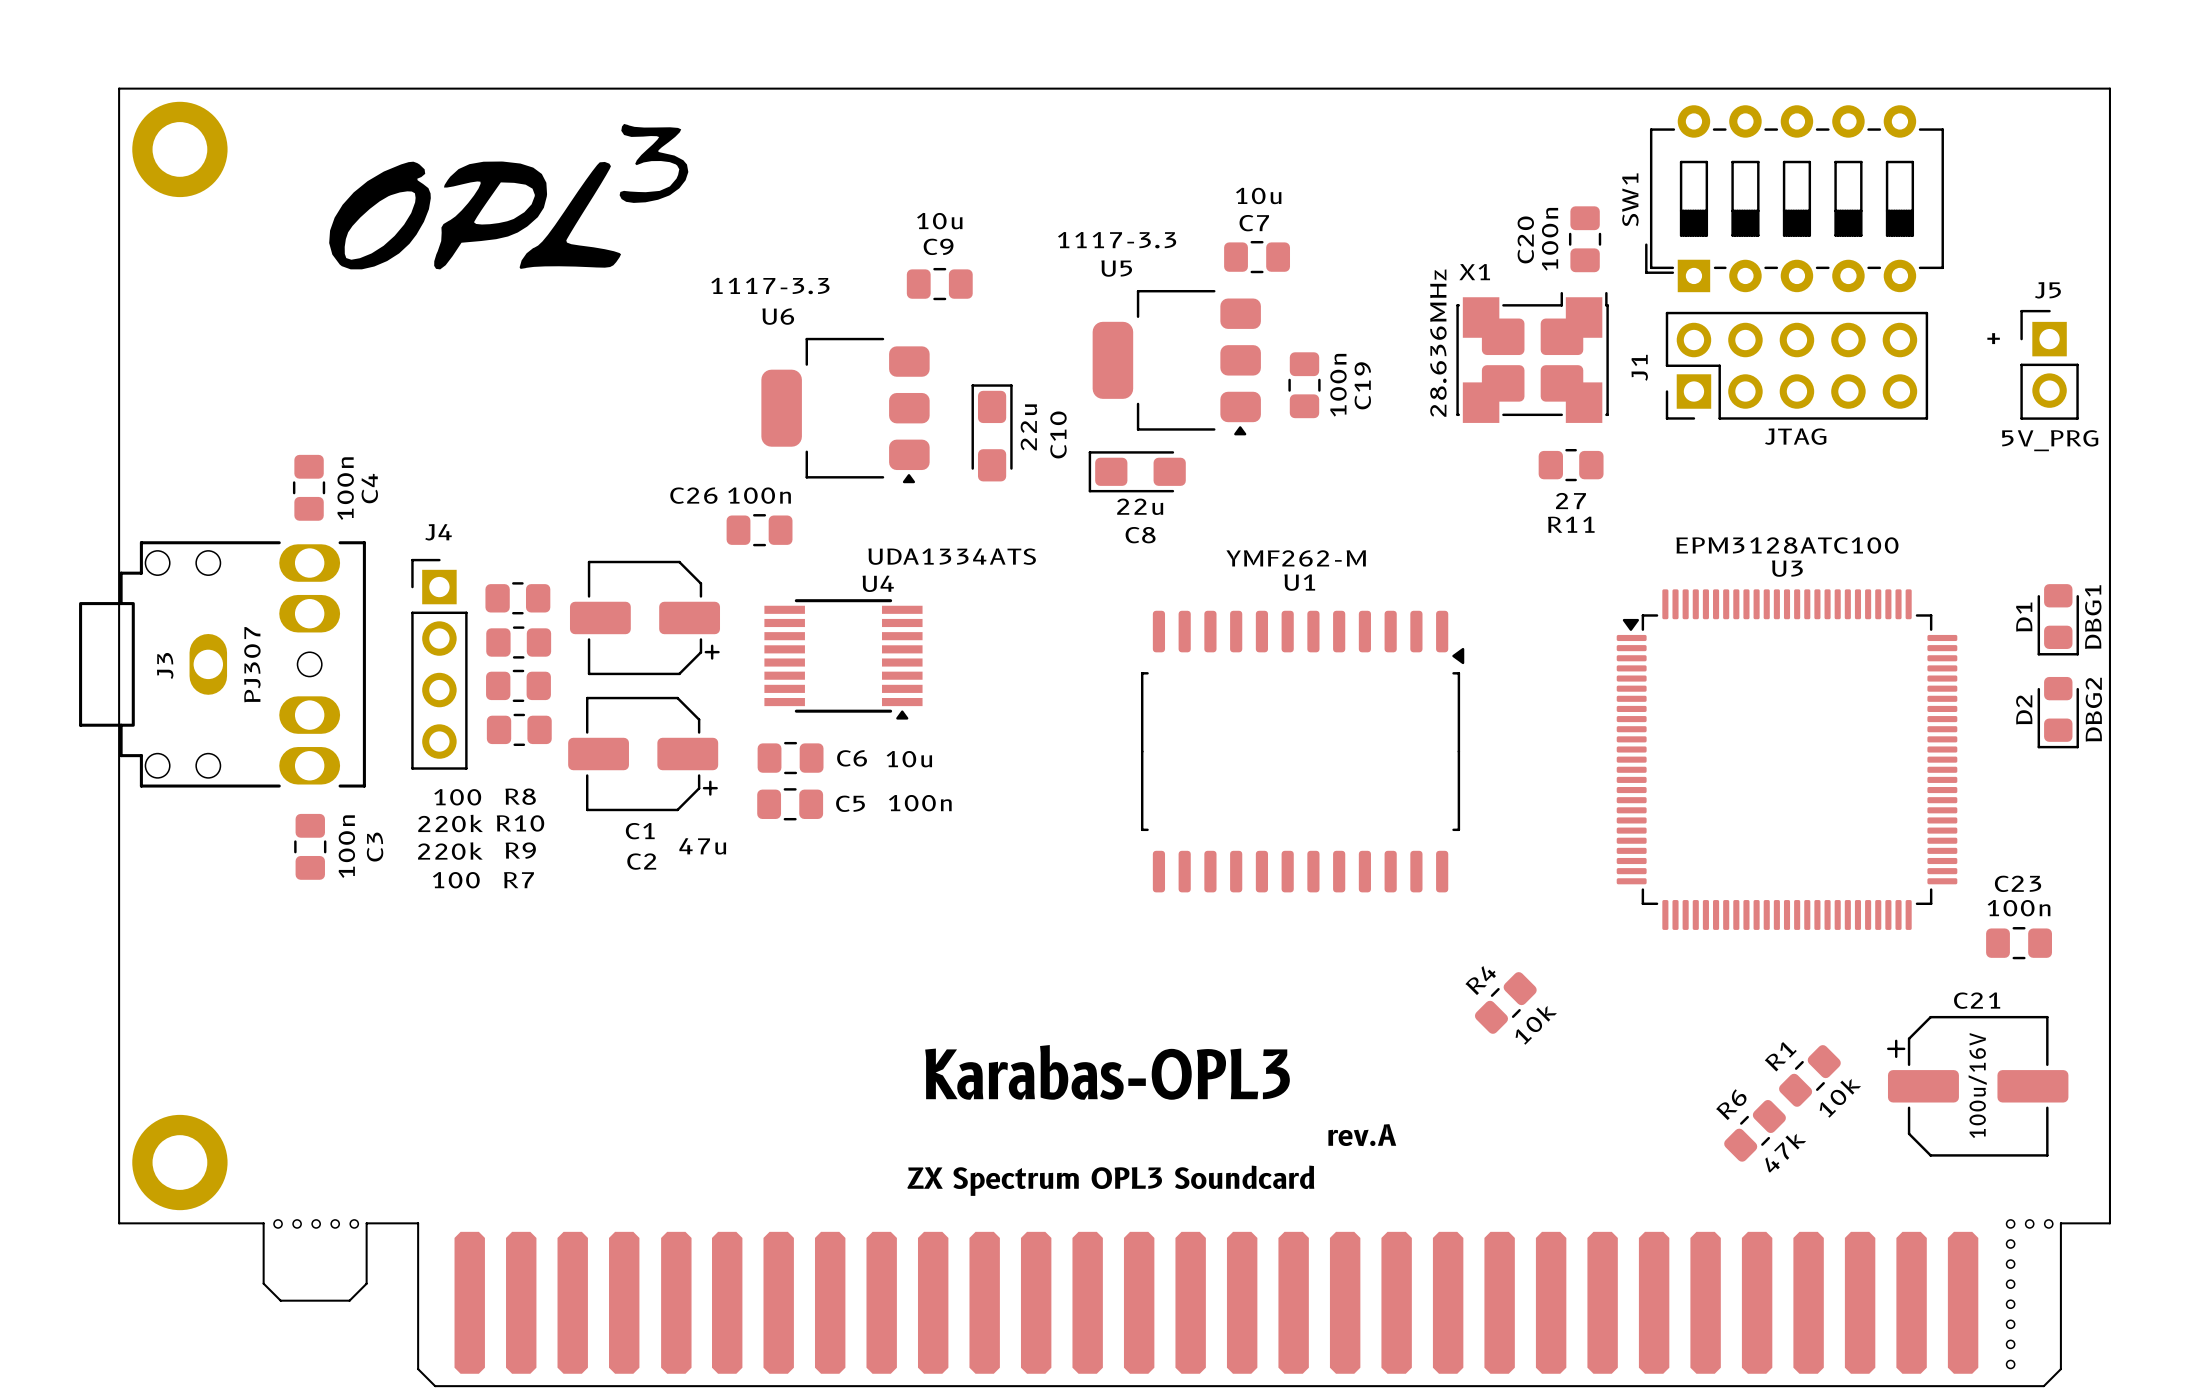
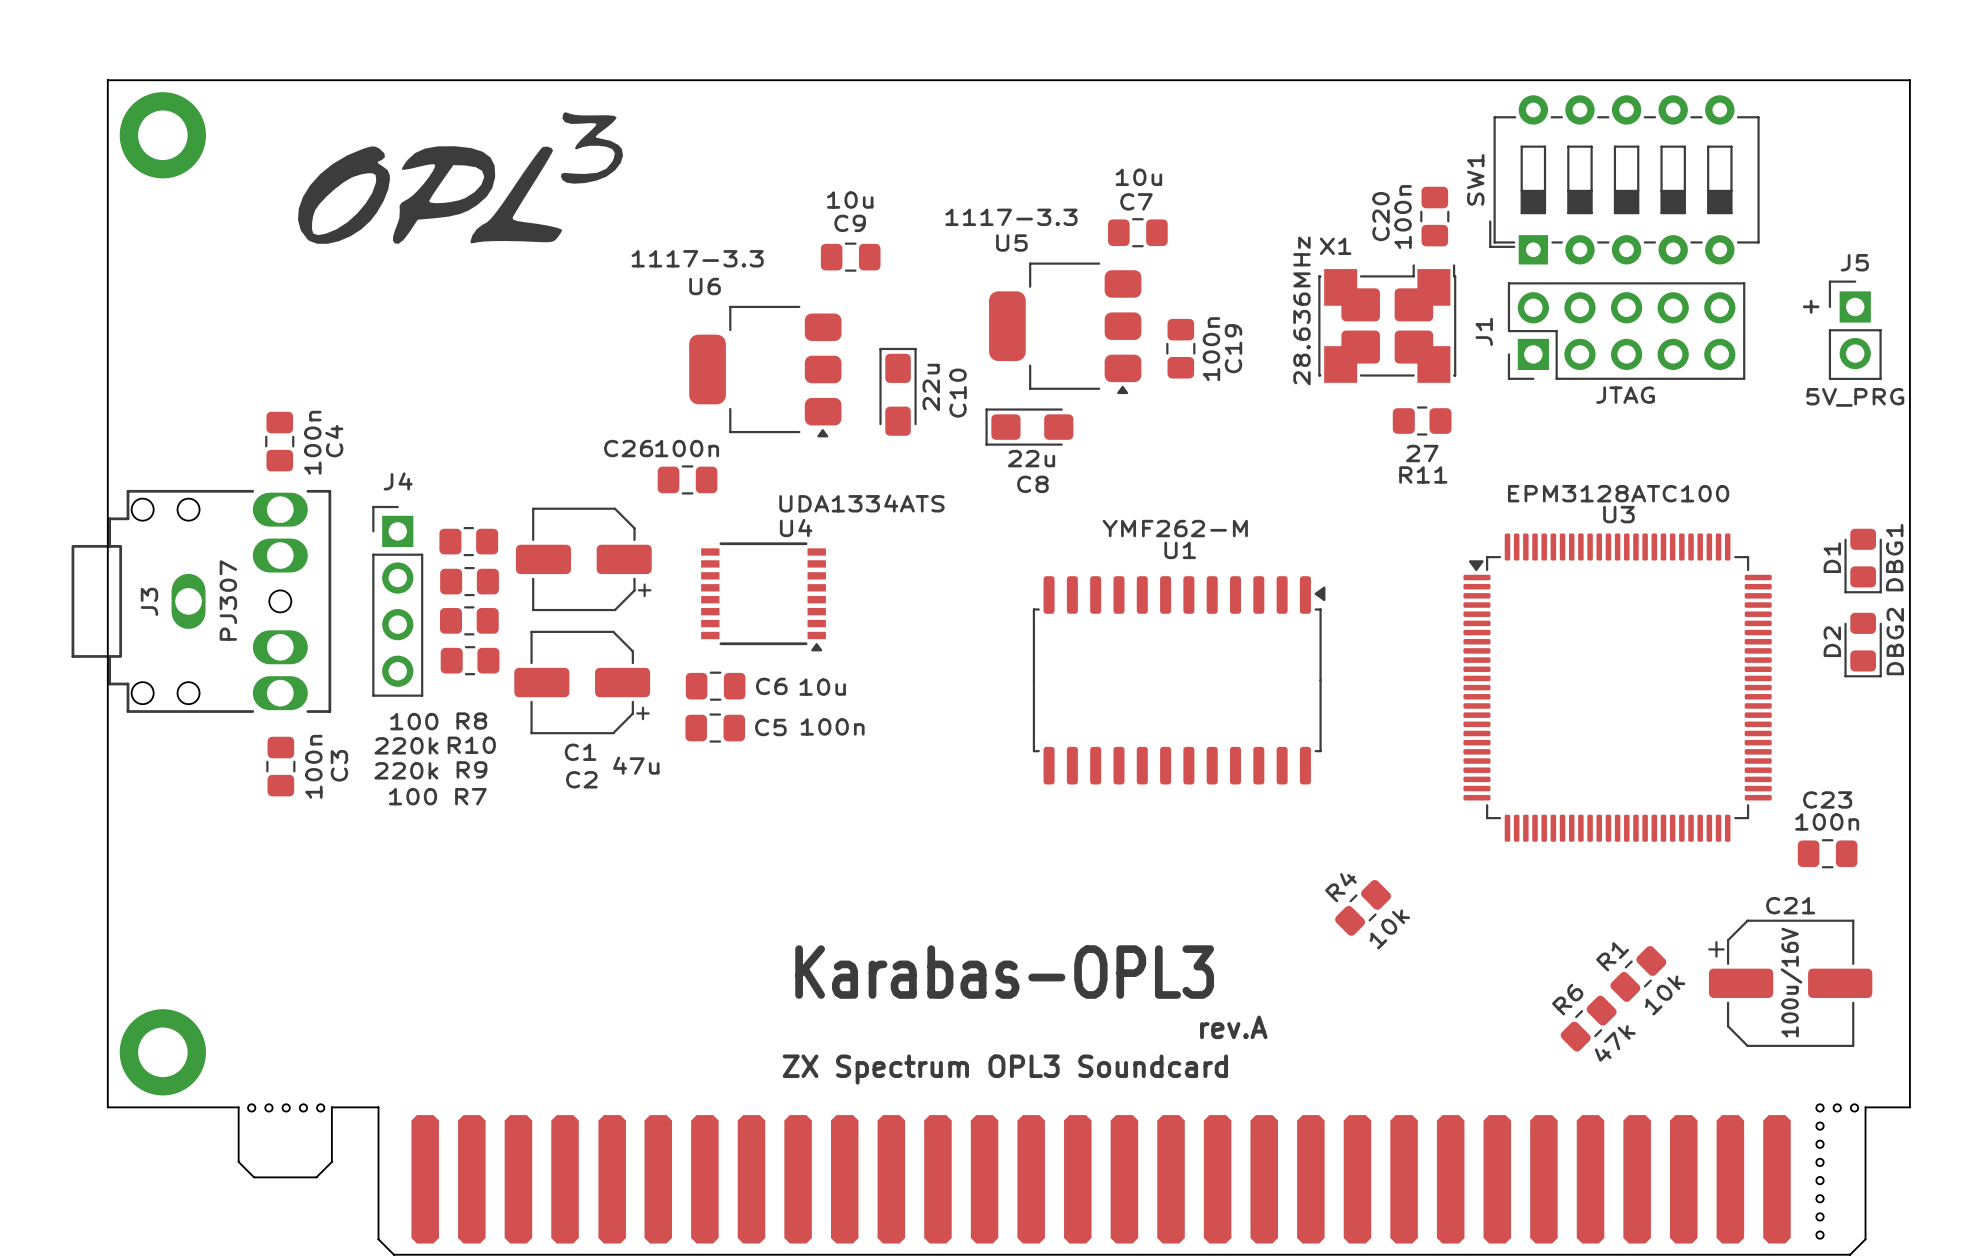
U4 footprint: [764, 599, 923, 720] -> [701, 542, 826, 652]
U1 footprint: [1140, 610, 1465, 893] -> [1032, 576, 1326, 785]

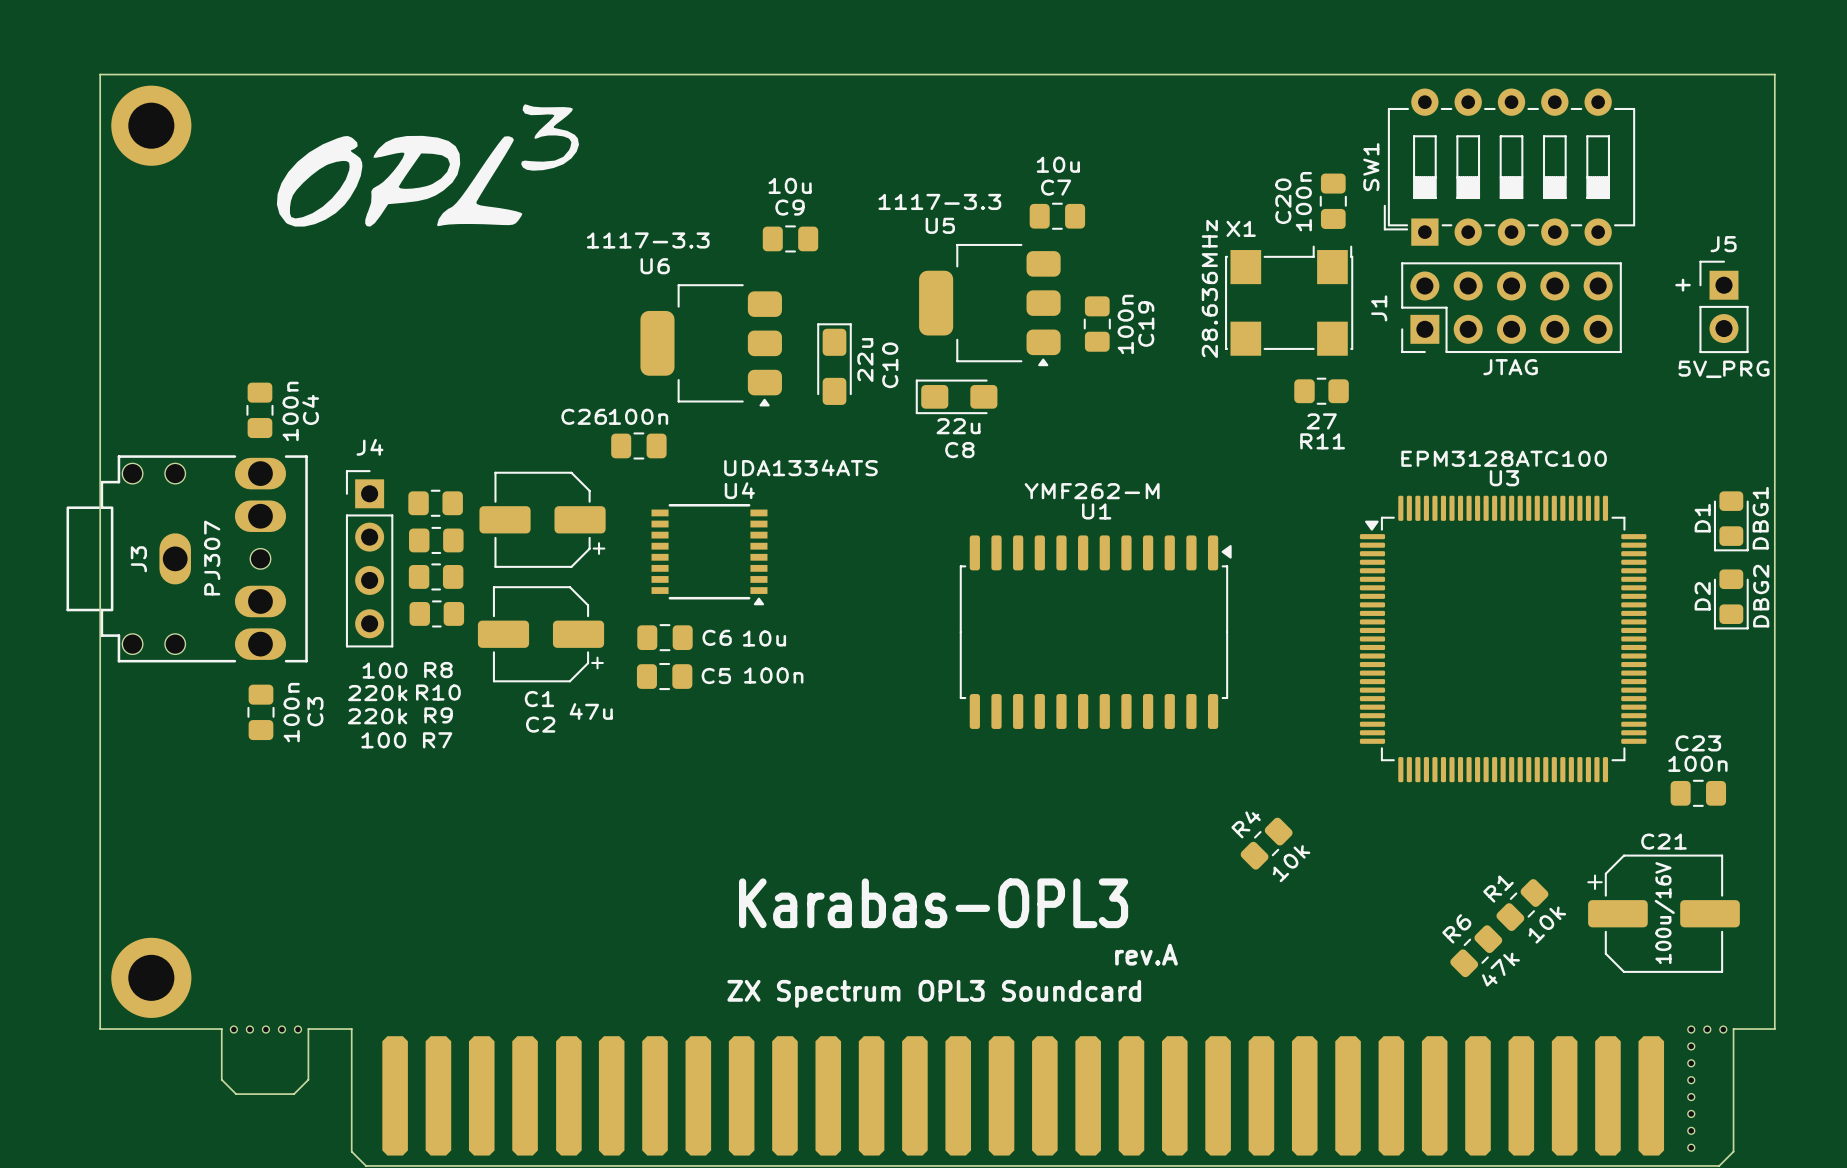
X1 footprint: [1318, 264, 1457, 383] -> [1225, 245, 1354, 356]

